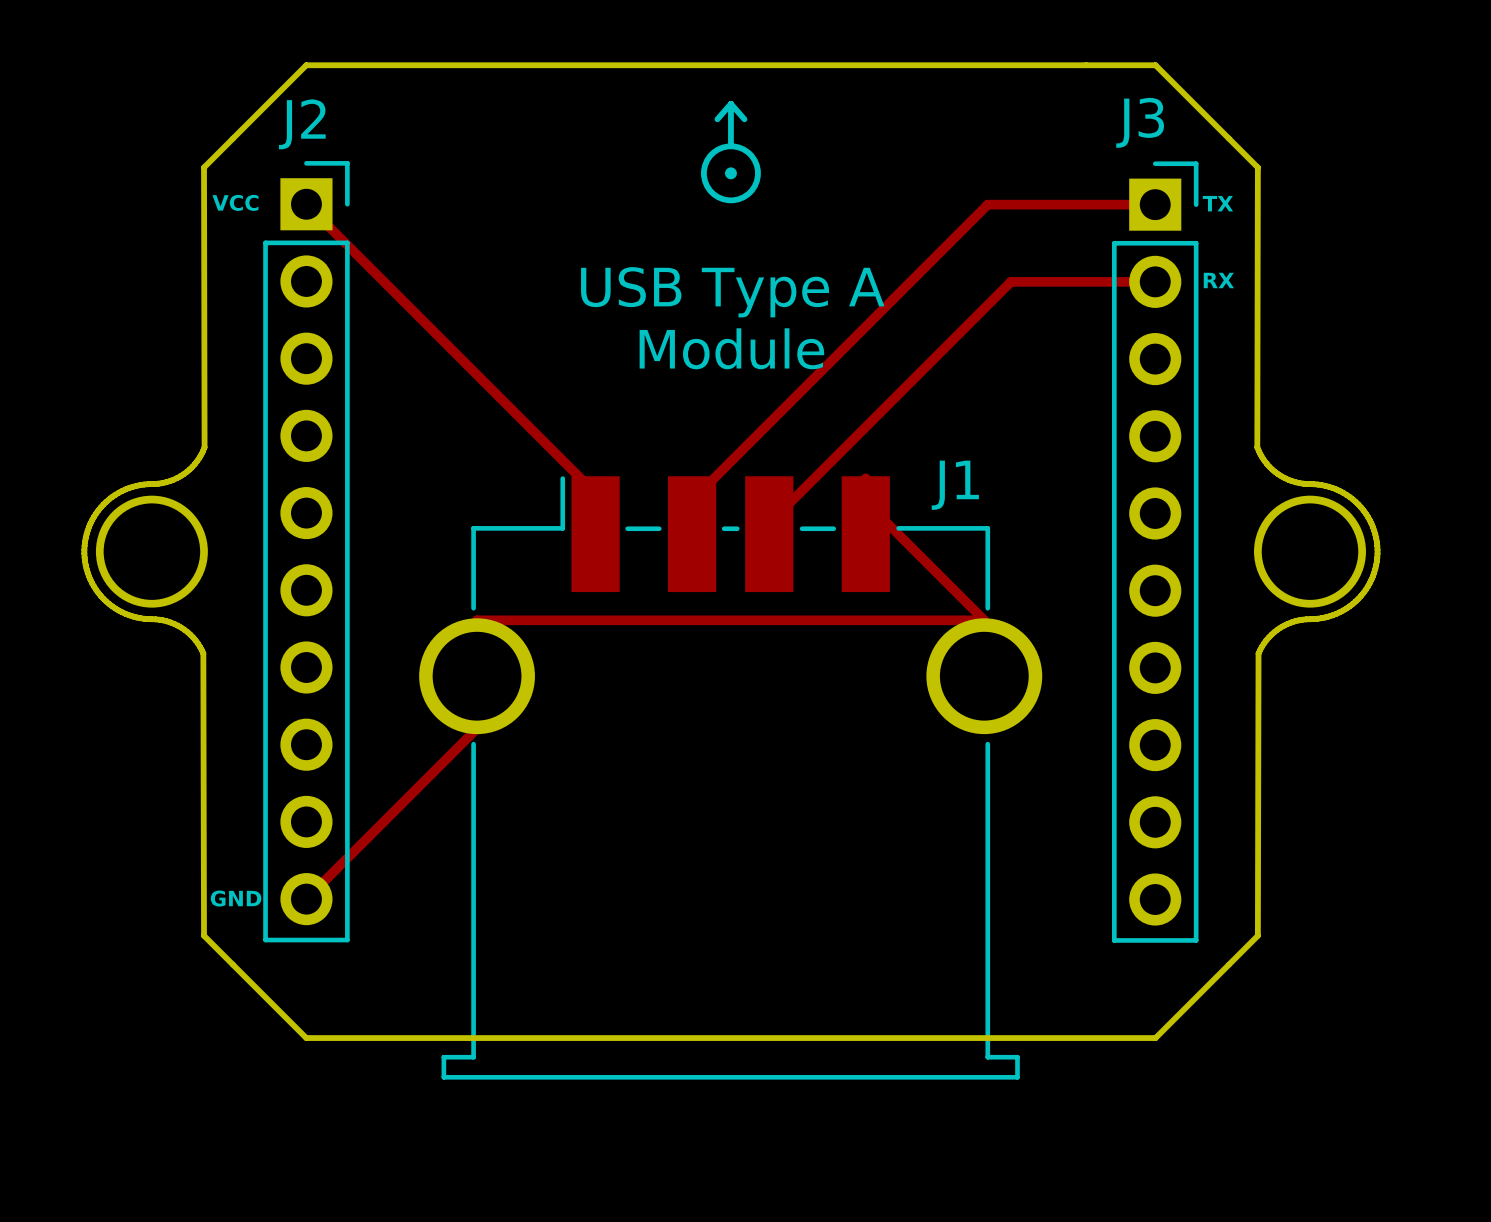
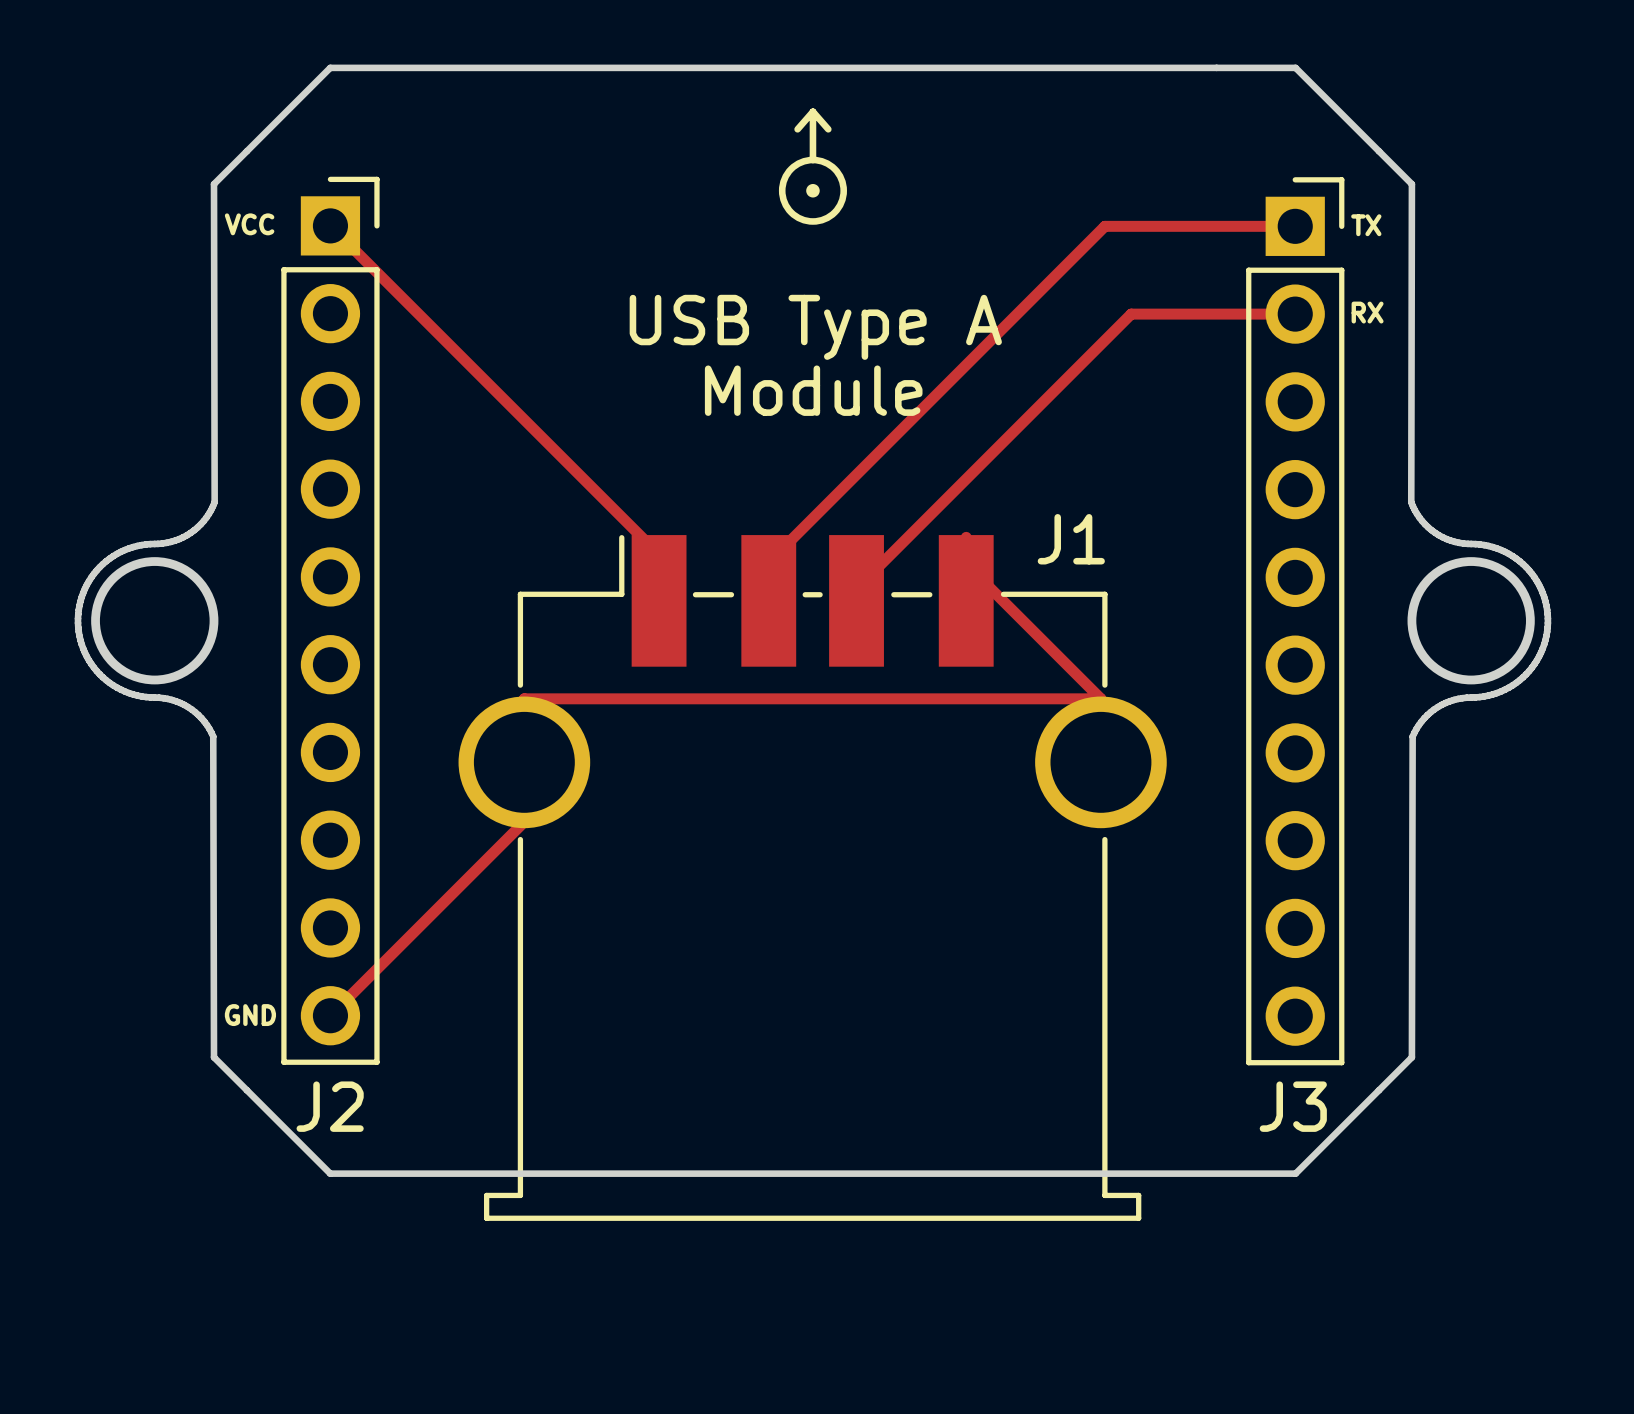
J3 name position: J3 (1140, 122) -> J3 (1293, 1106)
J2 name position: J2 (302, 124) -> J2 (330, 1106)

